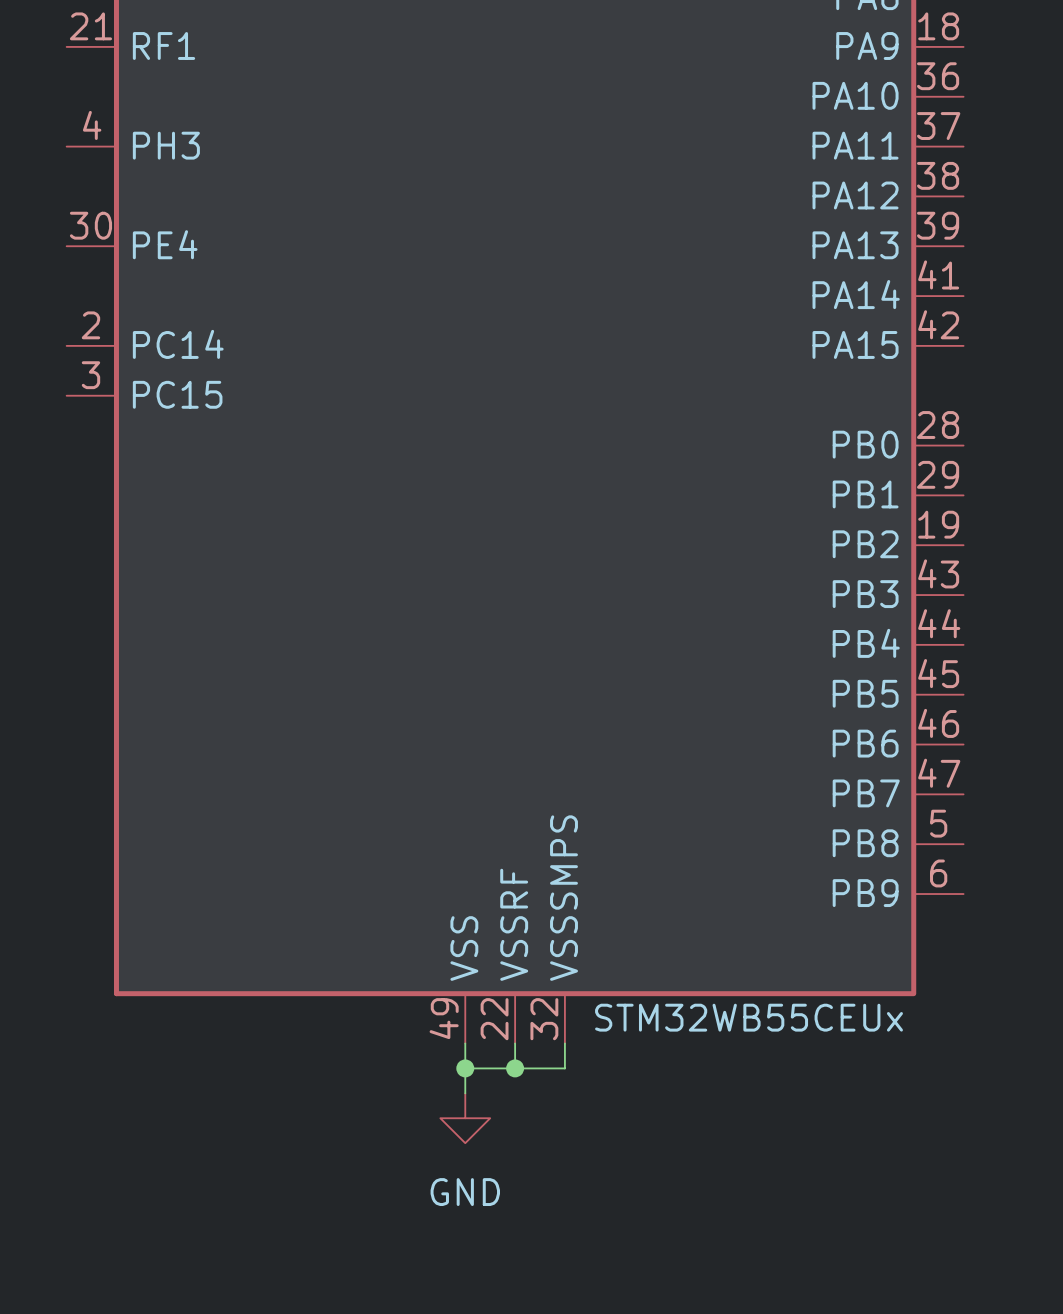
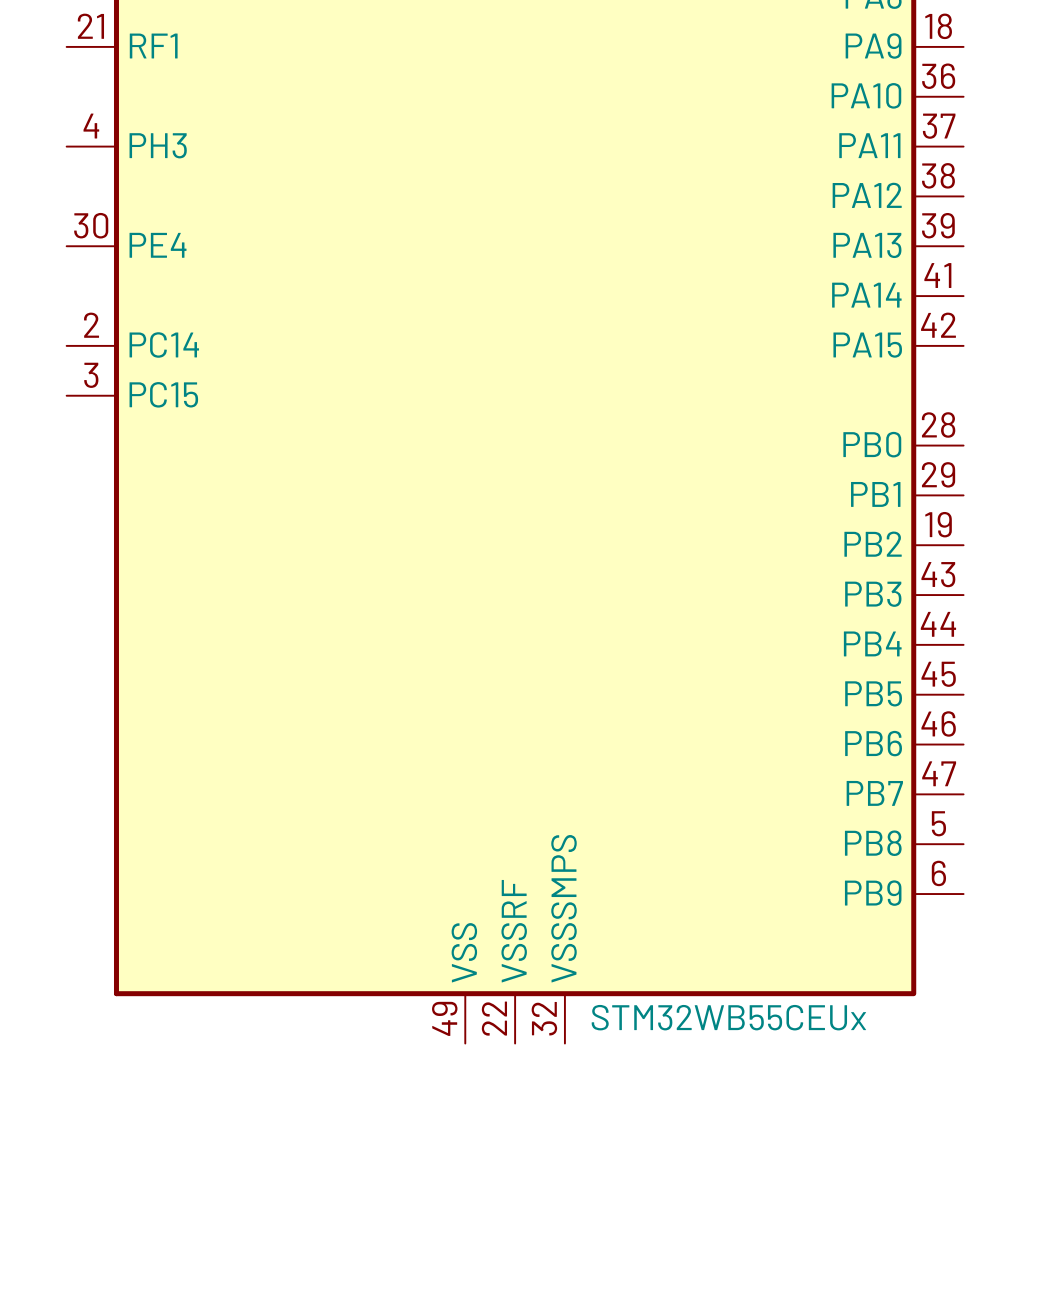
wire: (465, 1043) (465, 1093) -> none
wire: (515, 1043) (515, 1068) -> none
wire: (564, 1043) (564, 1068) (465, 1068) -> none
junction: (465, 1068) -> none
junction: (515, 1068) -> none
power symbol: GND (465, 1118) -> none

